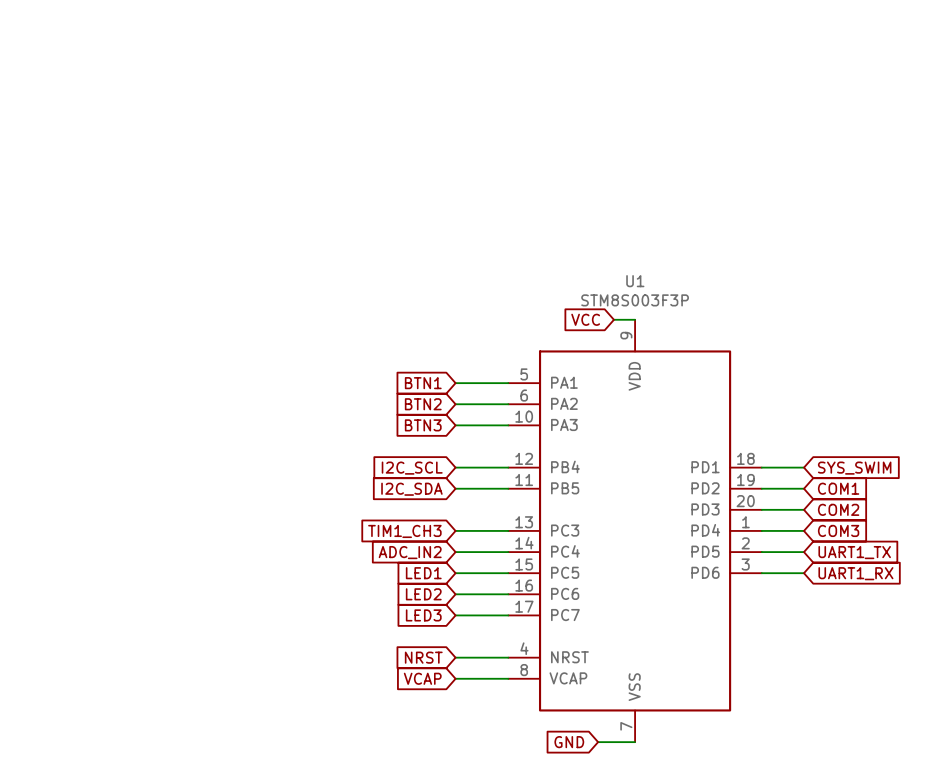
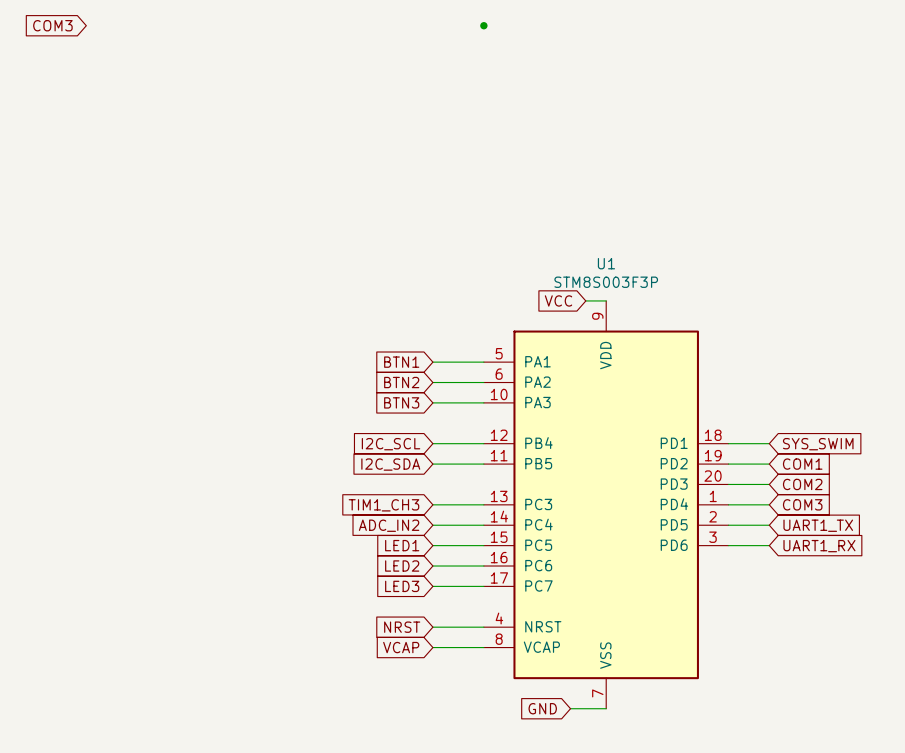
global label: none -> COM3 (52, 25)
junction: none -> (483, 25)

